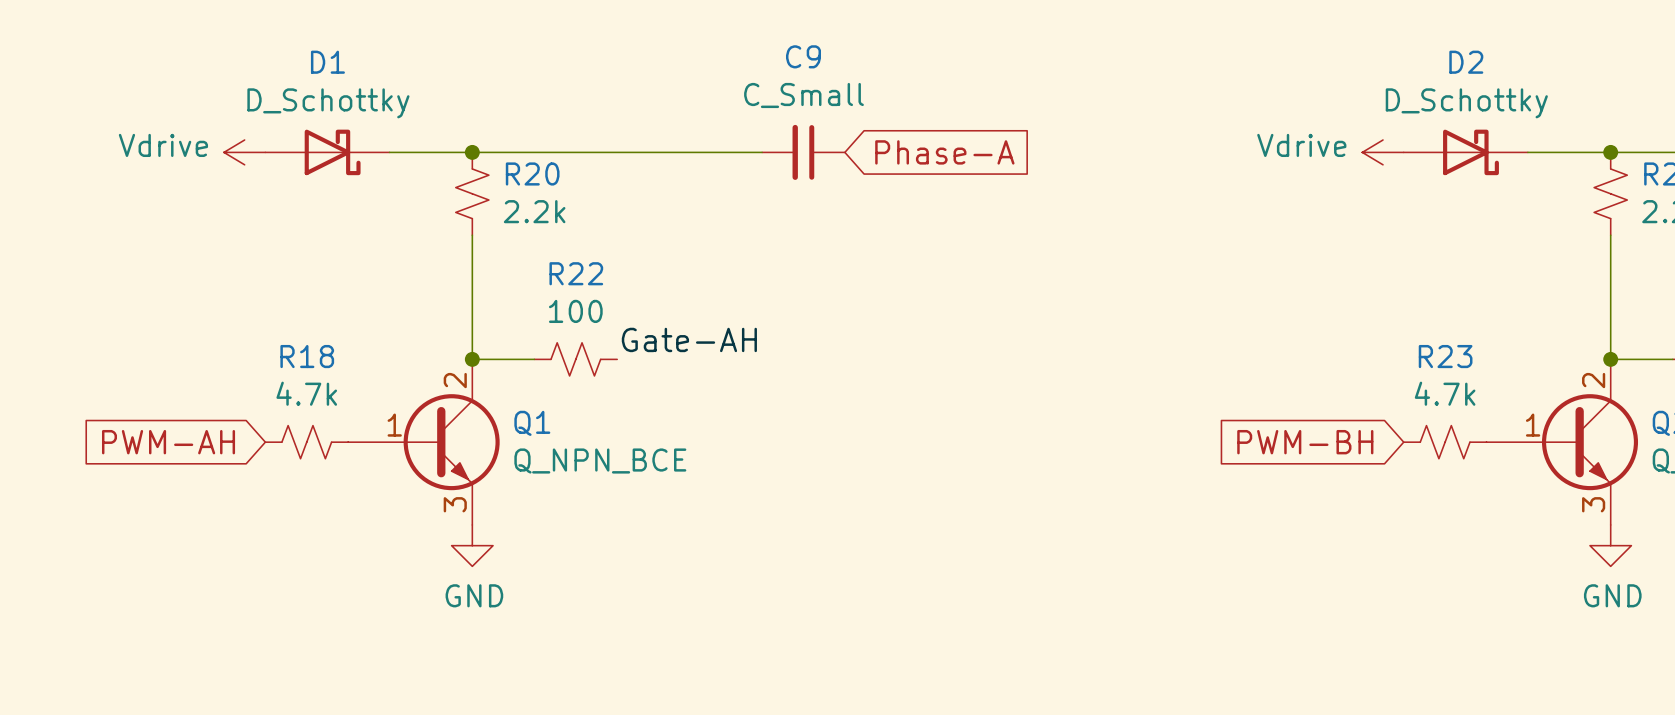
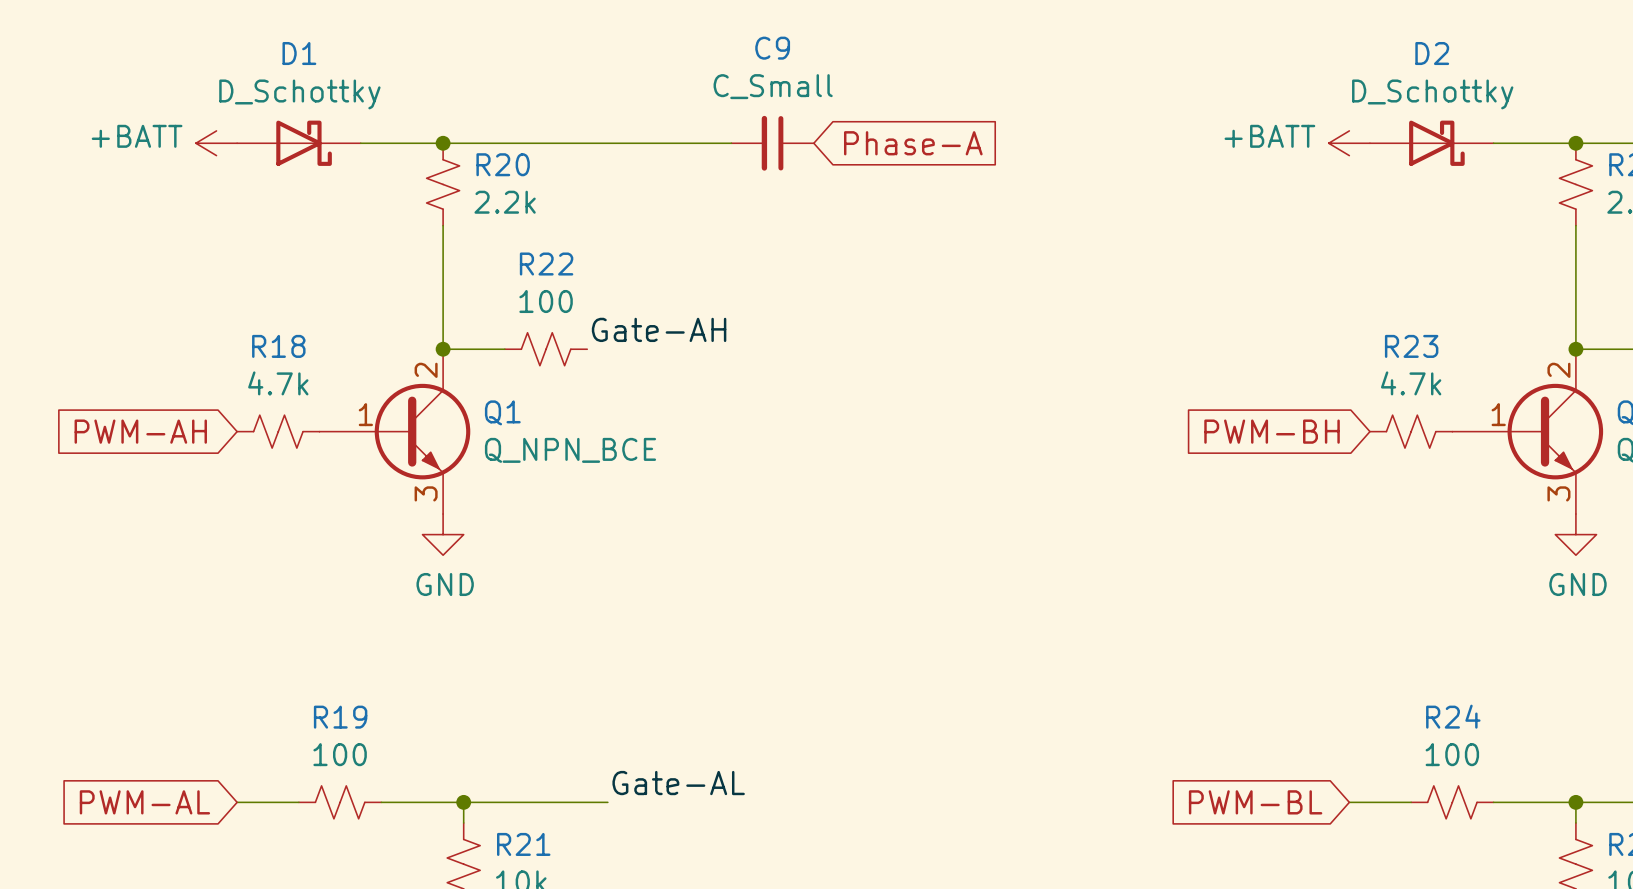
power symbol: Vdrive (244, 152) -> +BATT (216, 143)
power symbol: Vdrive (1383, 152) -> +BATT (1349, 143)

